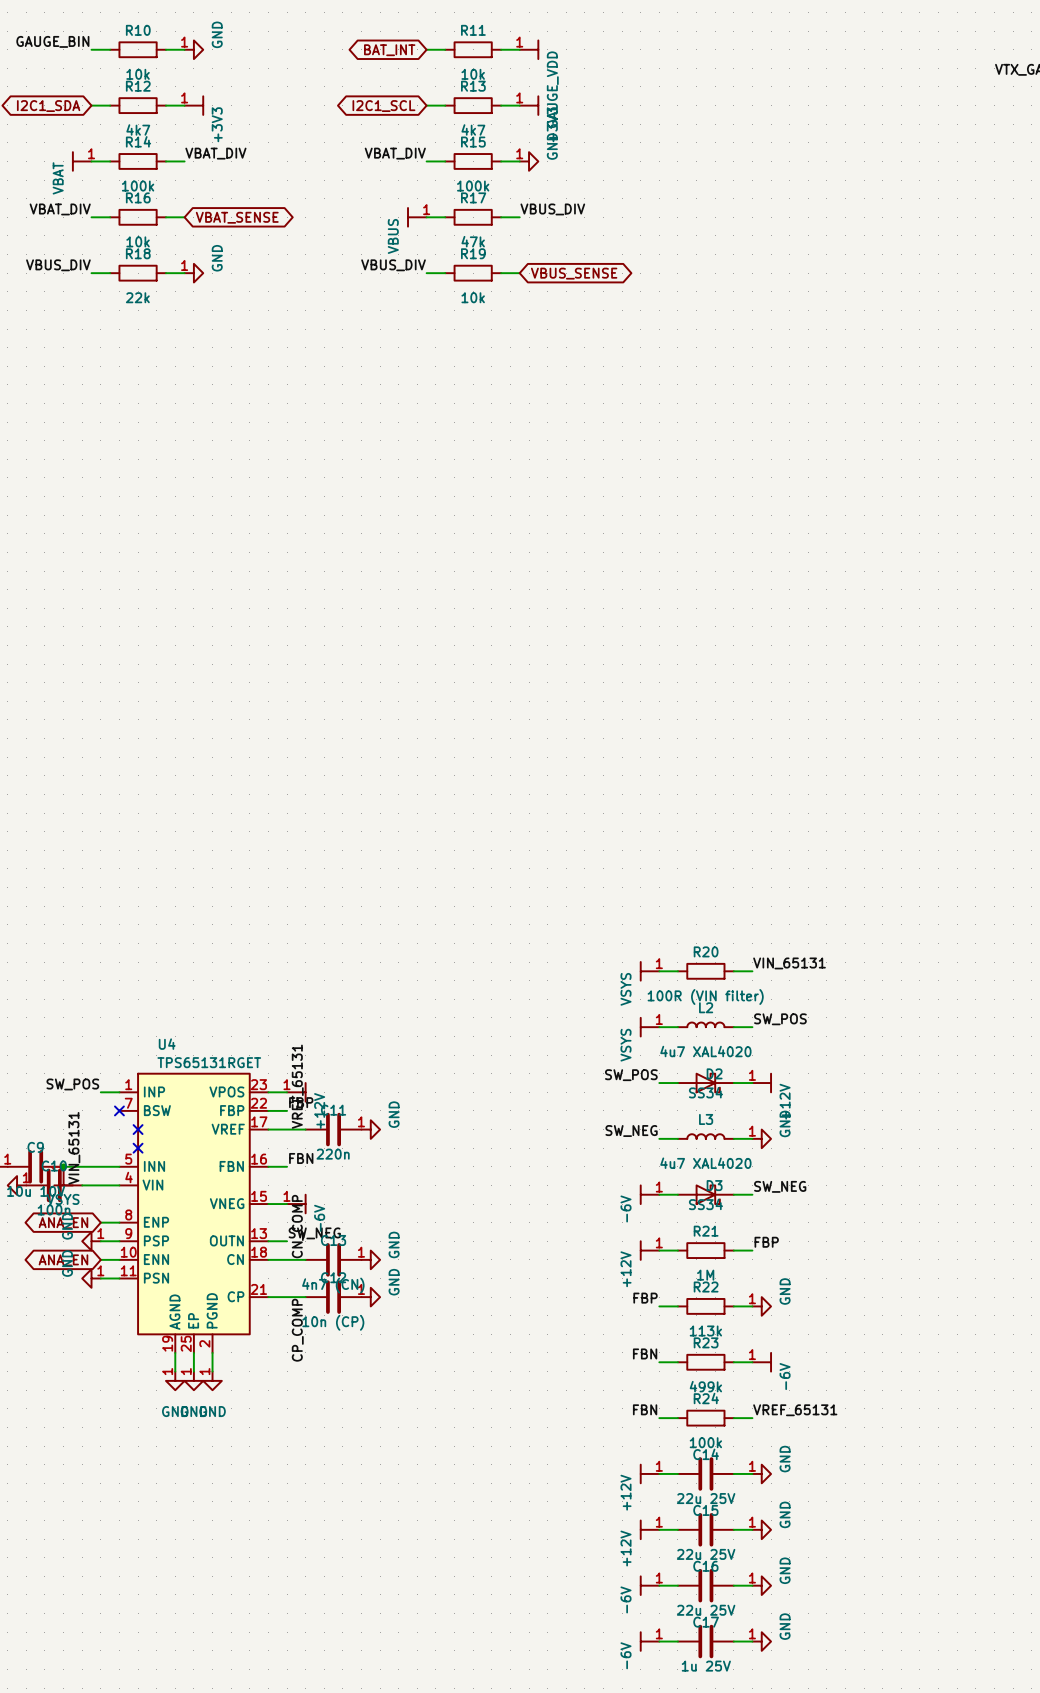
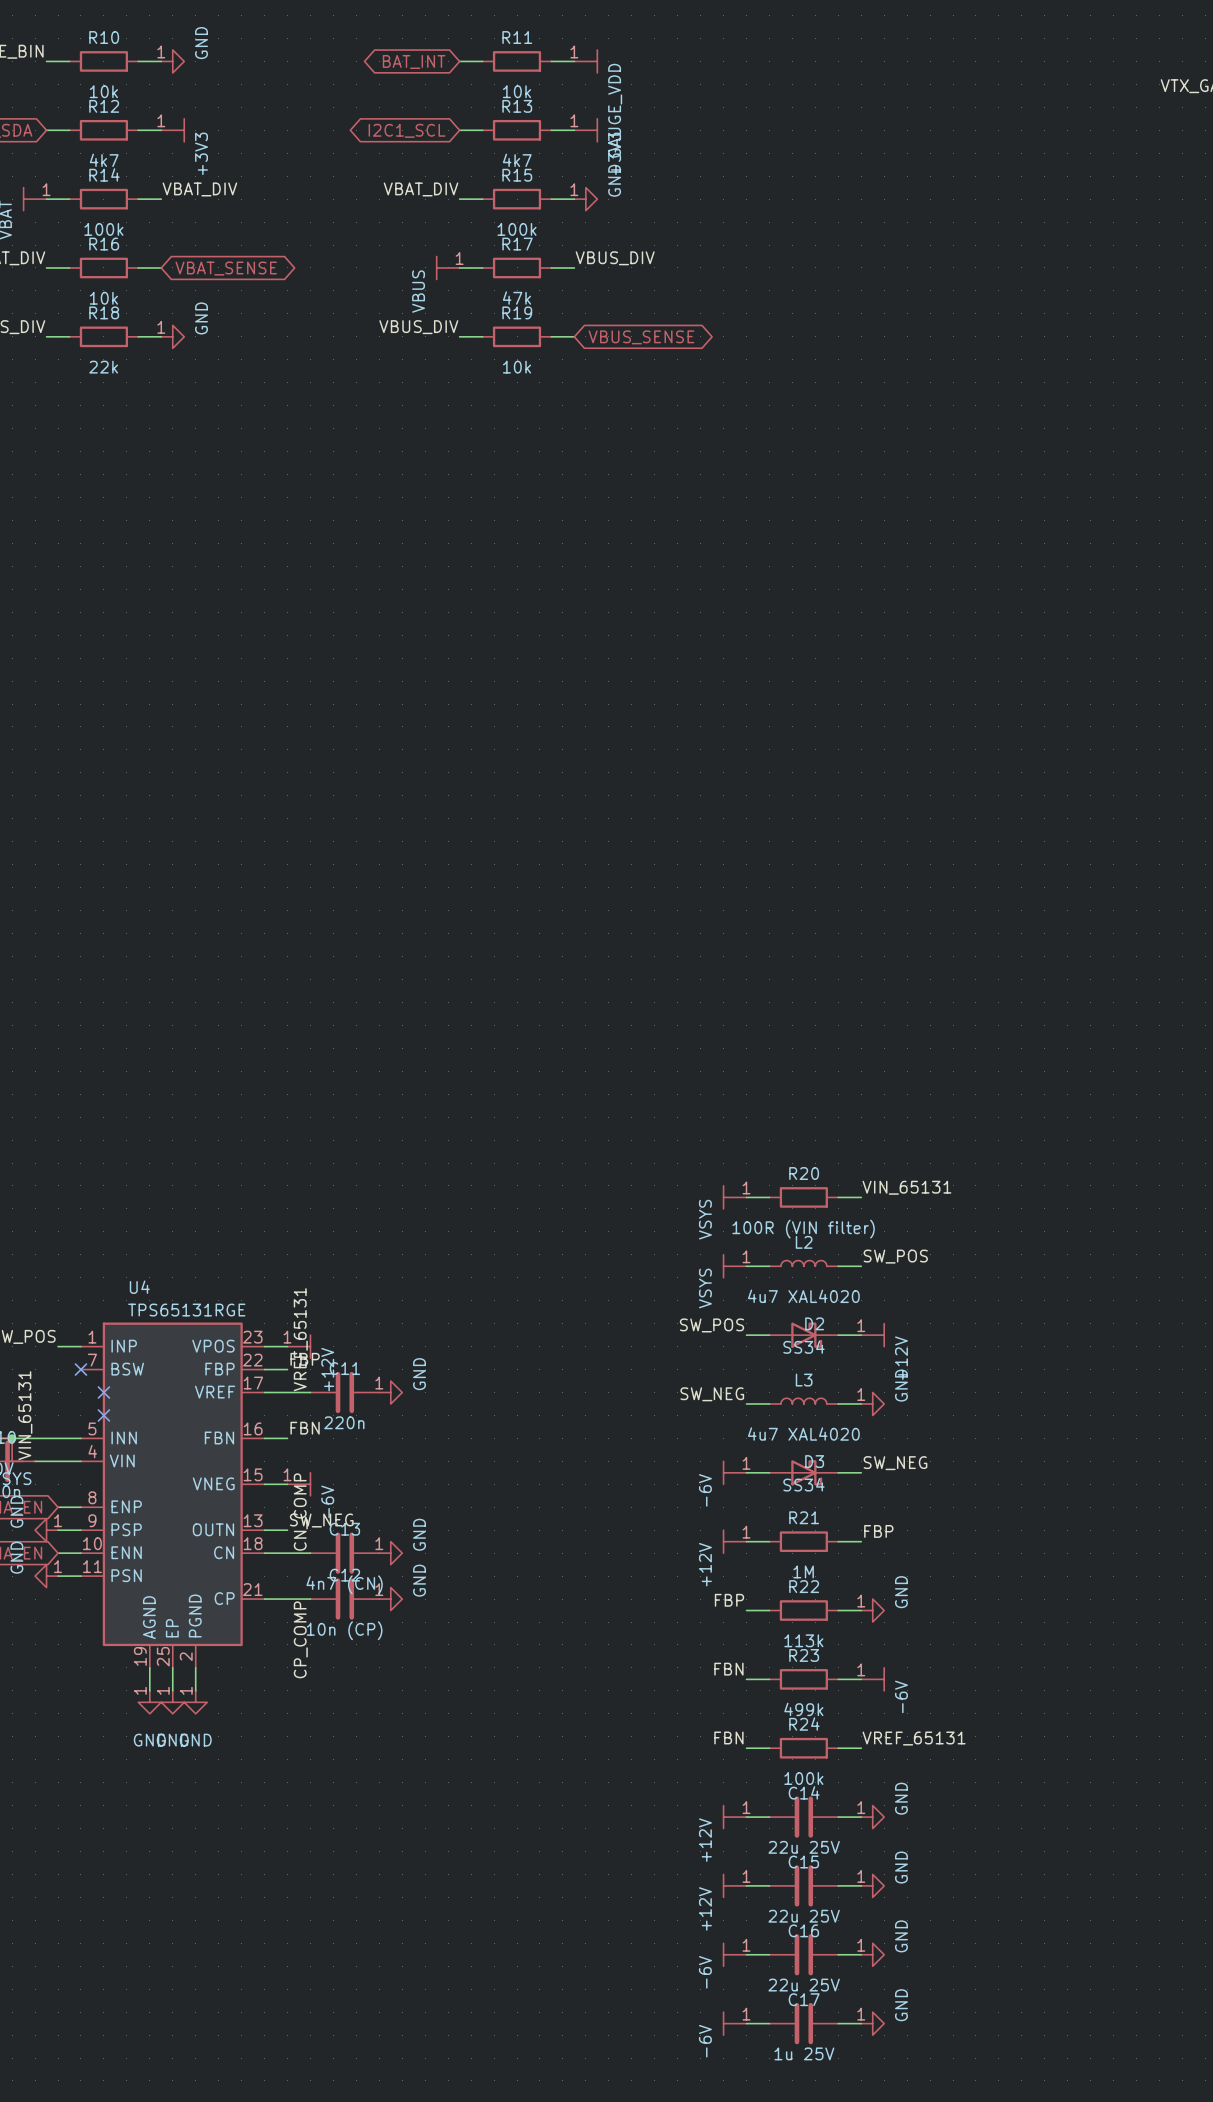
U4 value: TPS65131RGET (209, 1062) -> TPS65131RGE (186, 1310)

